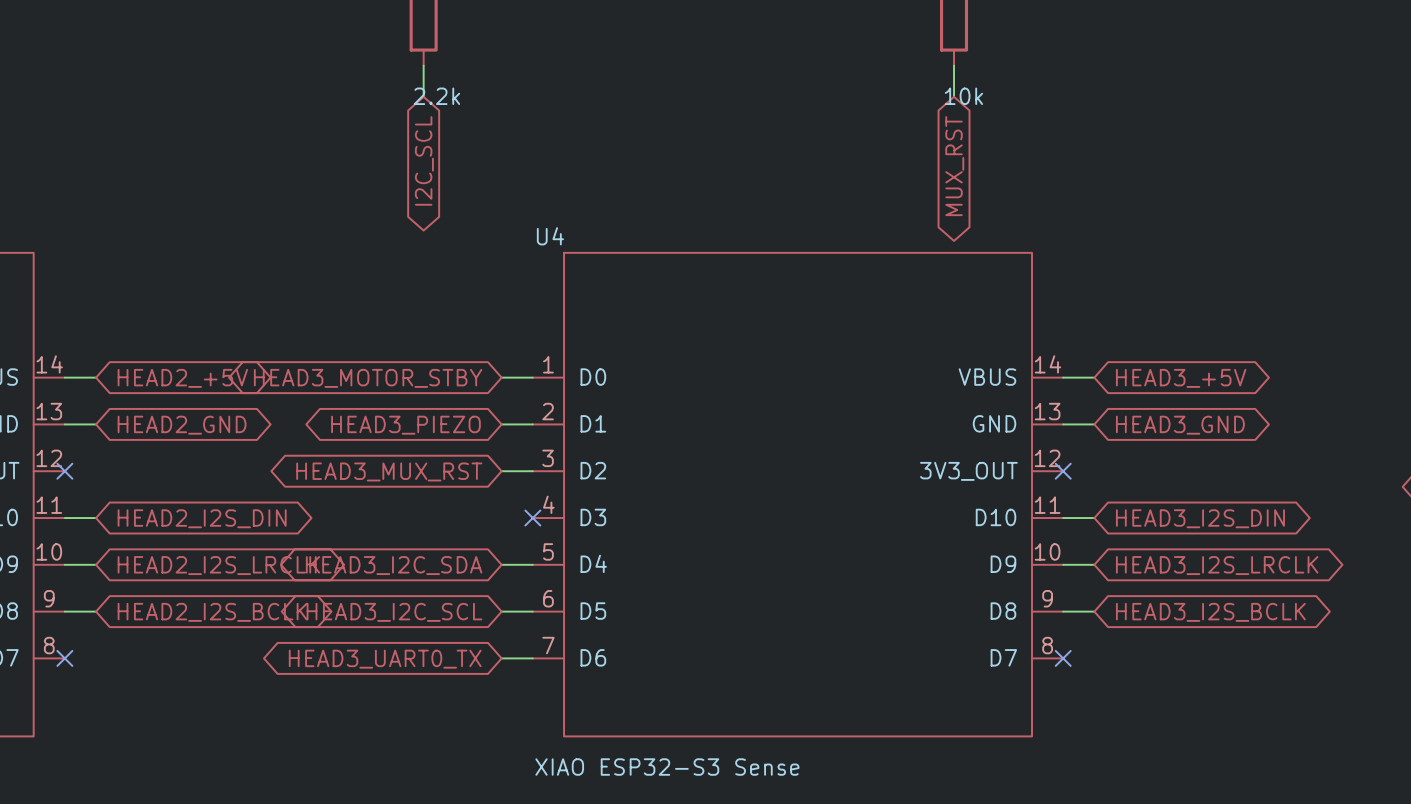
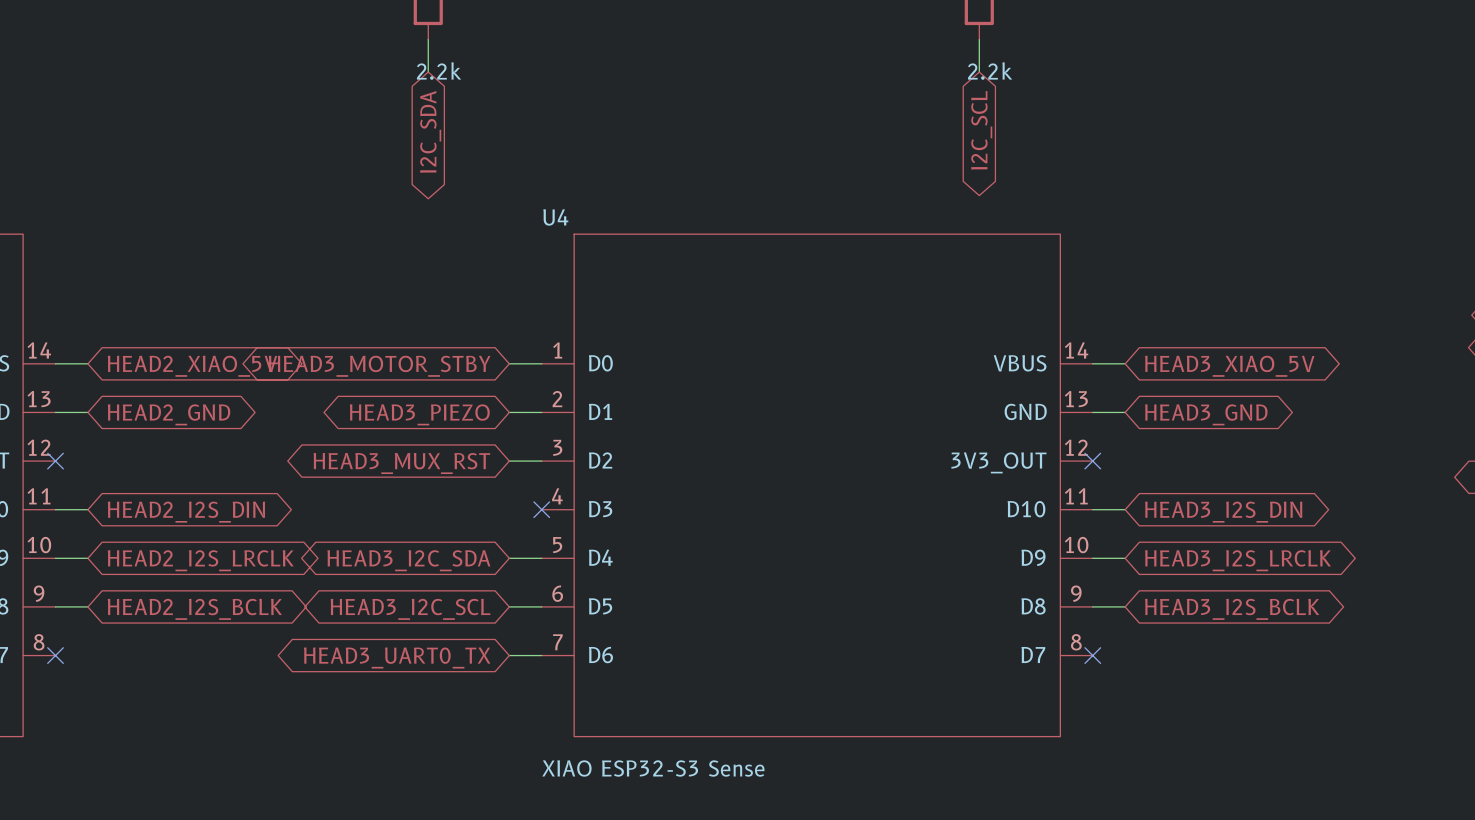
part value: 10k (963, 96) -> 2.2k (990, 71)
global label: I2C_SCL (424, 160) -> I2C_SDA (430, 131)
global label: MUX_RST (954, 166) -> I2C_SCL (981, 130)
global label: HEAD2_+5V (182, 378) -> HEAD2_XIAO_5V (192, 366)
global label: HEAD3_+5V (1181, 378) -> HEAD3_XIAO_5V (1229, 366)

